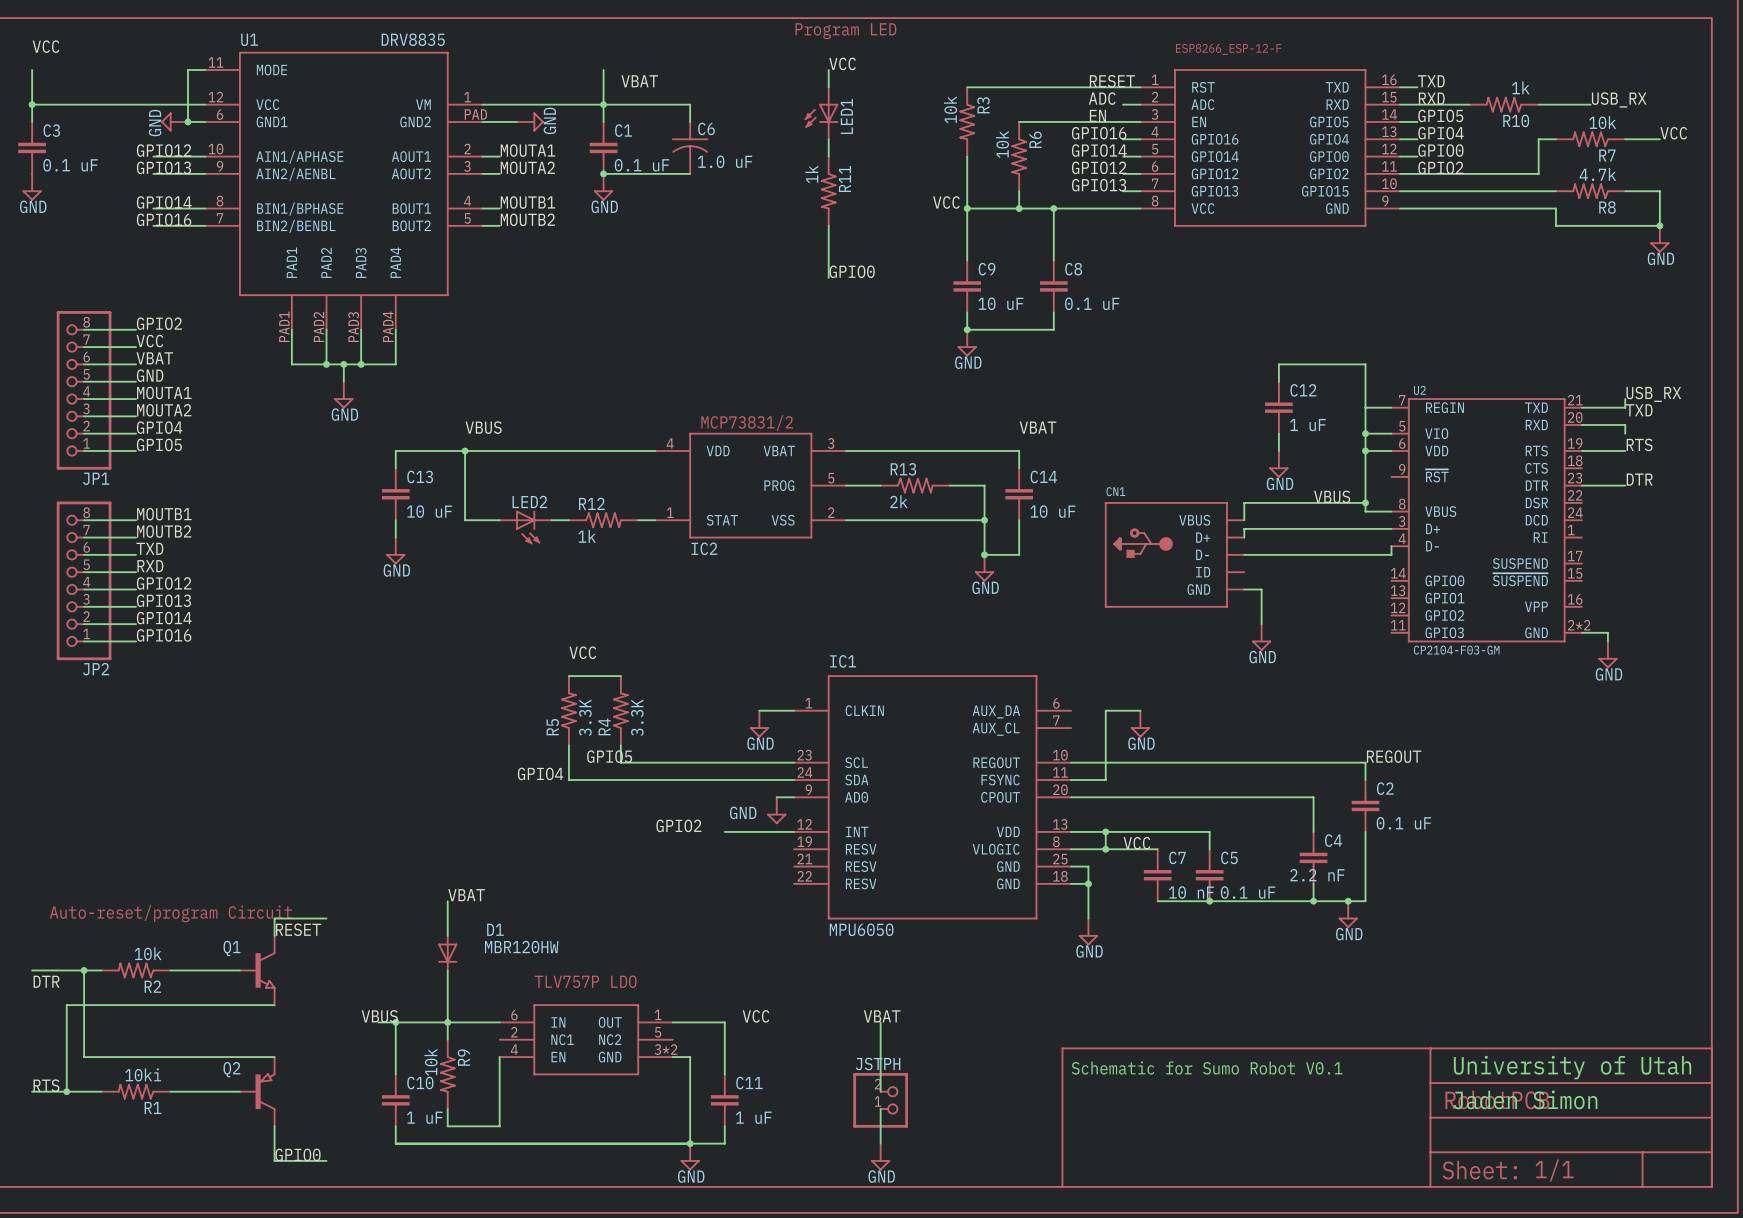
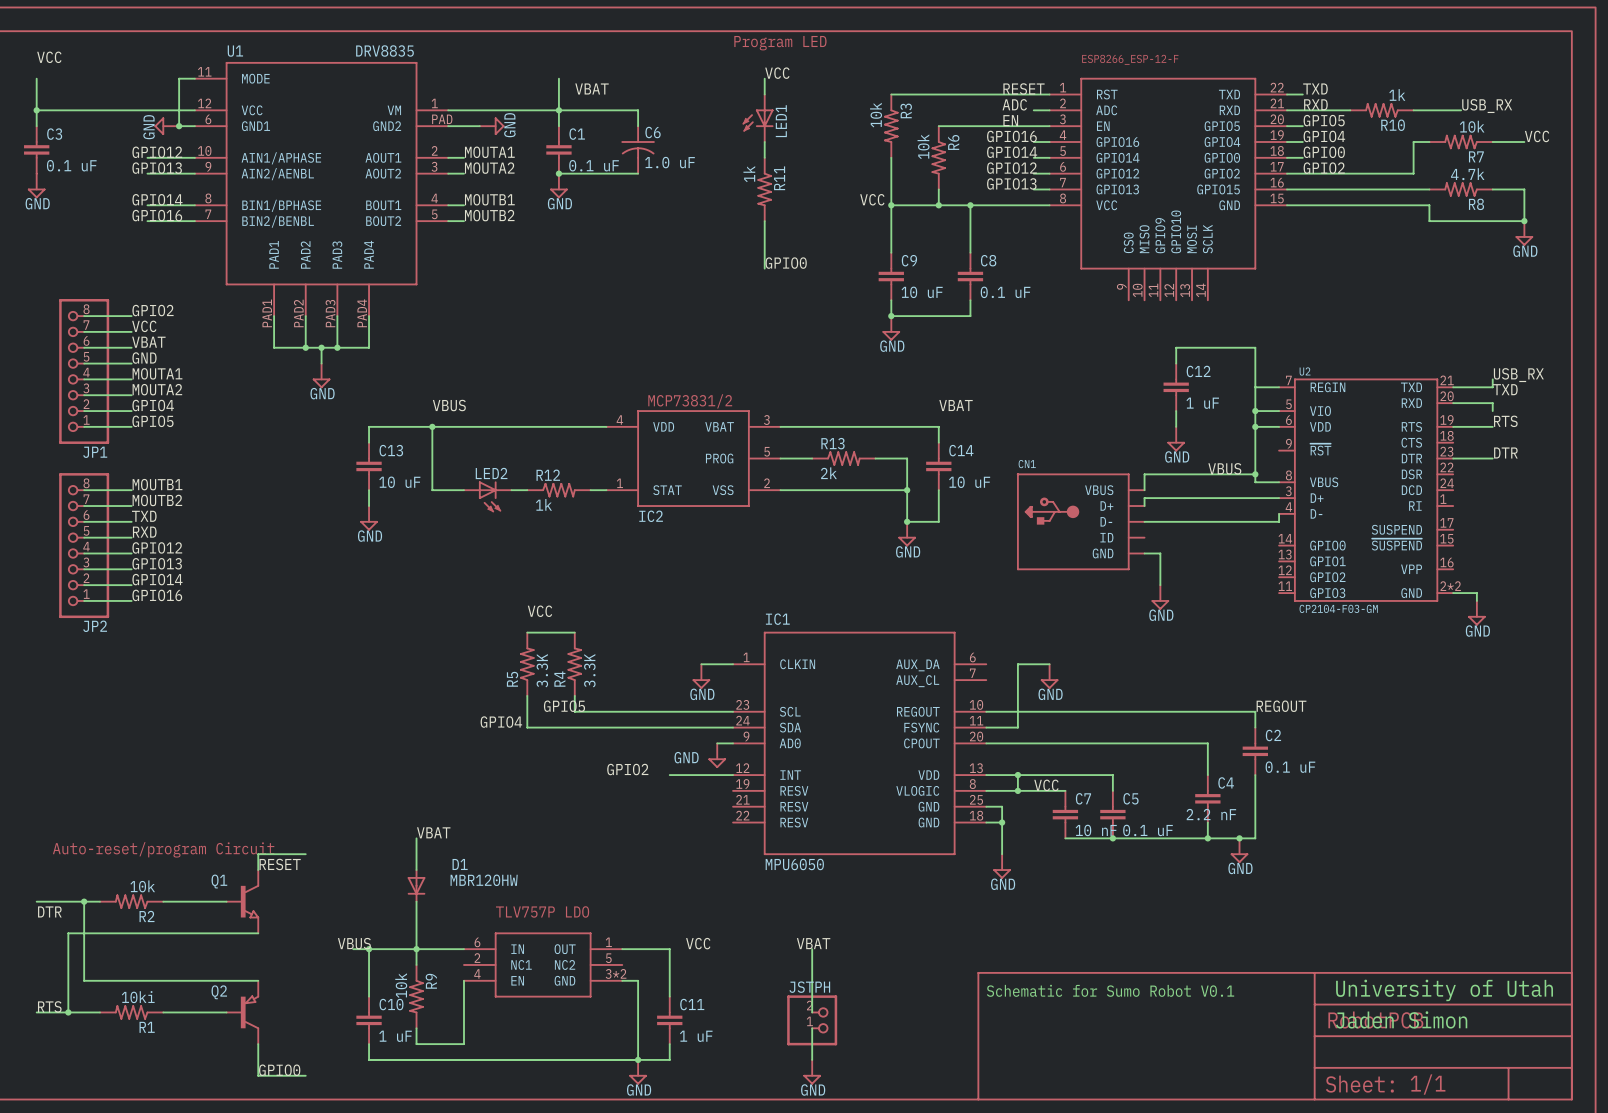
part: (1270, 147) -> none
part: none -> (1168, 189)

